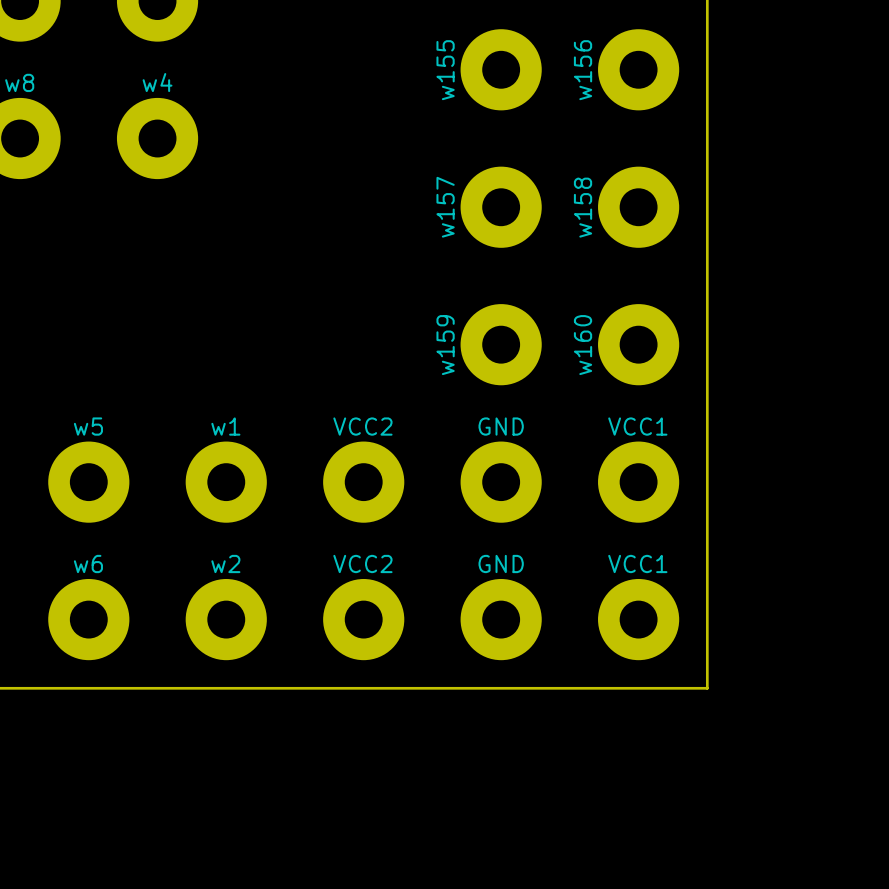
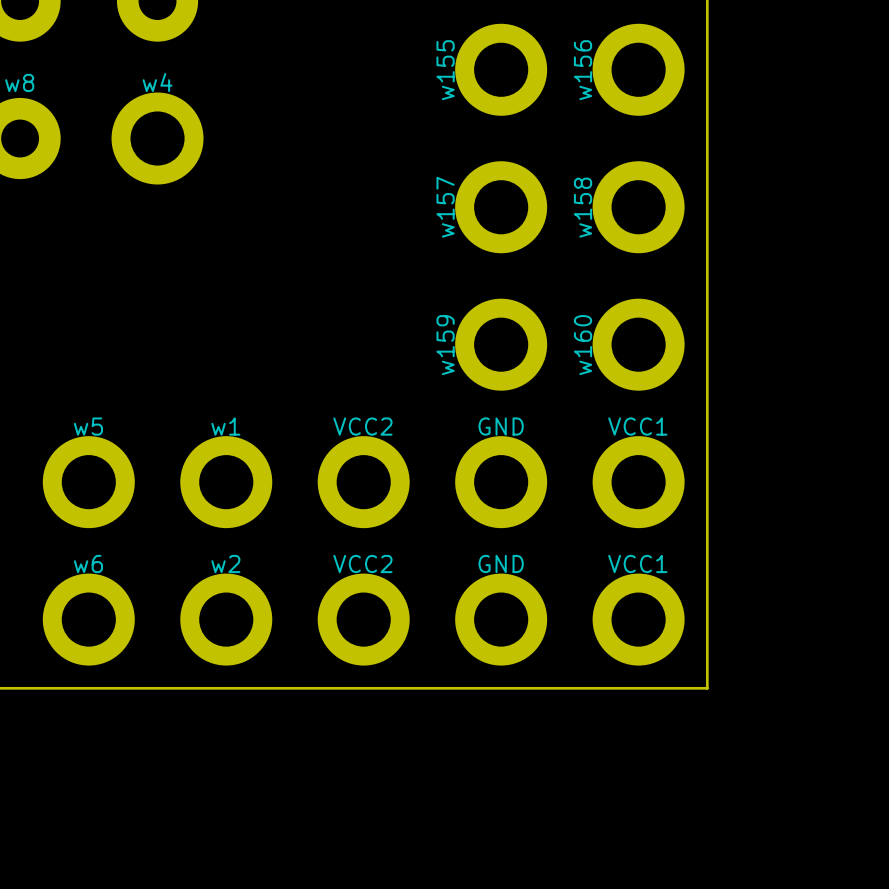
part footprint: [460, 29, 542, 111] -> [455, 23, 548, 116]
part footprint: [598, 29, 680, 111] -> [592, 23, 685, 116]
part footprint: [116, 97, 199, 180] -> [111, 92, 204, 185]
part footprint: [460, 166, 542, 248] -> [455, 161, 548, 254]
part footprint: [598, 166, 680, 248] -> [592, 161, 685, 254]
part footprint: [460, 304, 542, 386] -> [455, 298, 548, 391]
part footprint: [598, 304, 680, 386] -> [592, 298, 685, 391]
part footprint: [48, 441, 130, 523] -> [42, 436, 135, 529]
part footprint: [185, 441, 267, 523] -> [180, 436, 273, 529]
part footprint: [323, 441, 405, 523] -> [317, 436, 410, 529]
part footprint: [460, 441, 542, 523] -> [455, 436, 548, 529]
part footprint: [598, 441, 680, 523] -> [592, 436, 685, 529]
part footprint: [48, 578, 130, 661] -> [42, 573, 135, 666]
part footprint: [185, 578, 267, 661] -> [180, 573, 273, 666]
part footprint: [323, 578, 405, 661] -> [317, 573, 410, 666]
part footprint: [460, 578, 542, 661] -> [455, 573, 548, 666]
part footprint: [598, 578, 680, 661] -> [592, 573, 685, 666]

